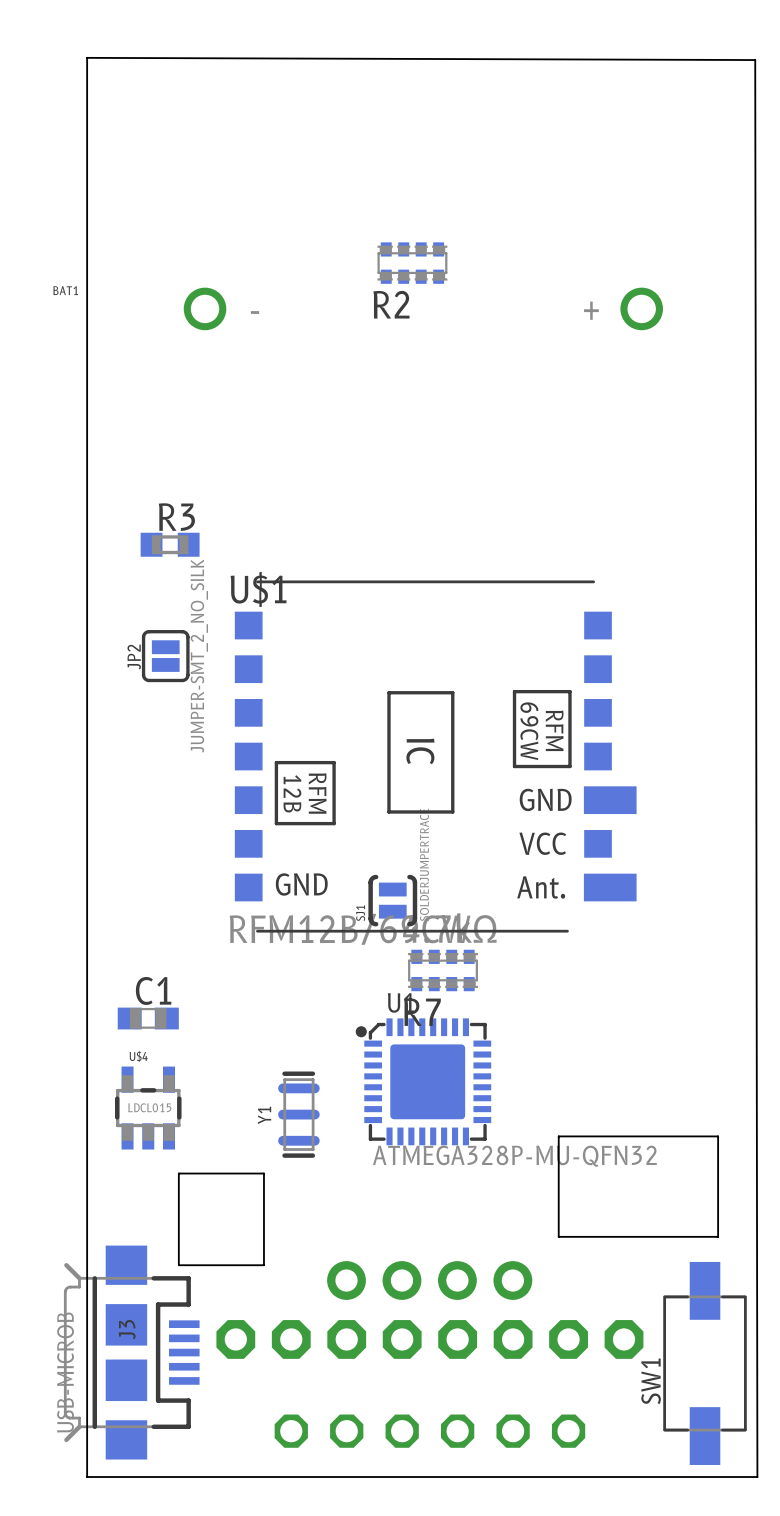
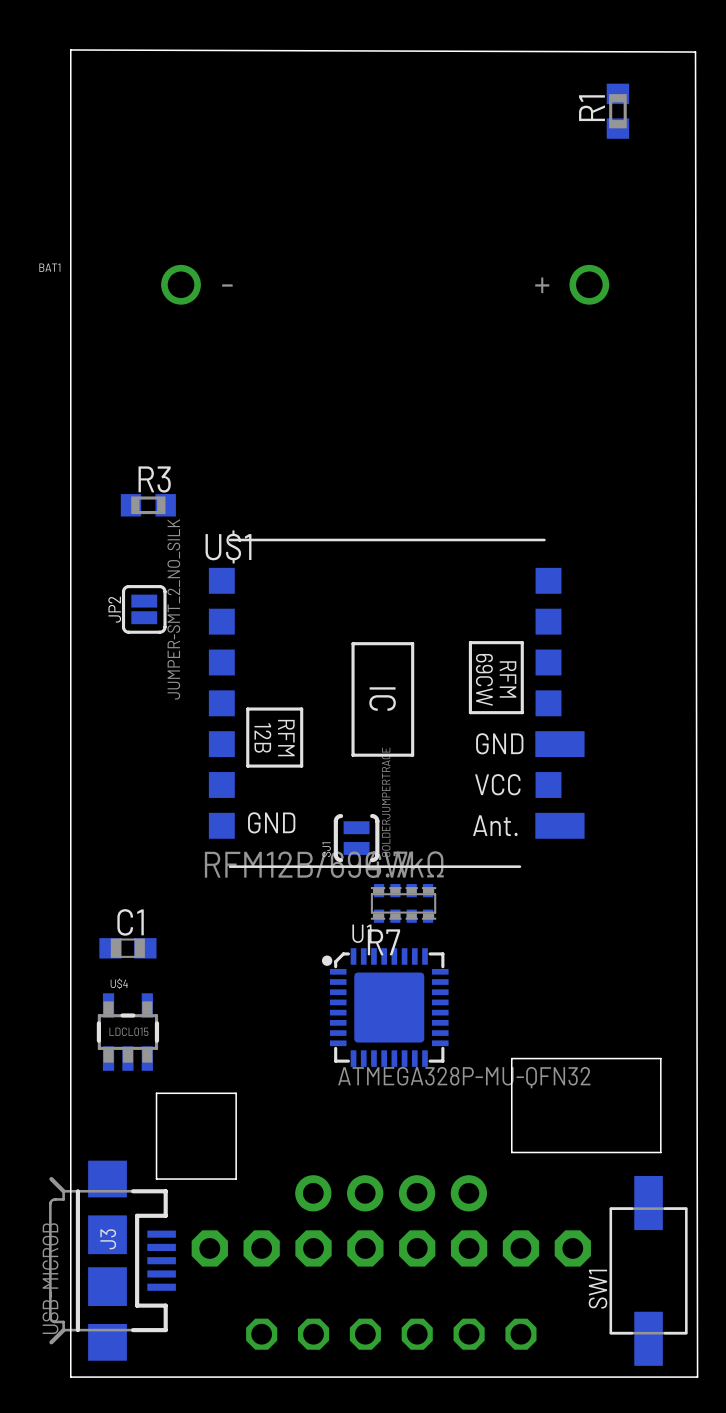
R1: none -> (617, 111)
R2: (412, 263) -> none
Y1: (298, 1114) -> none

